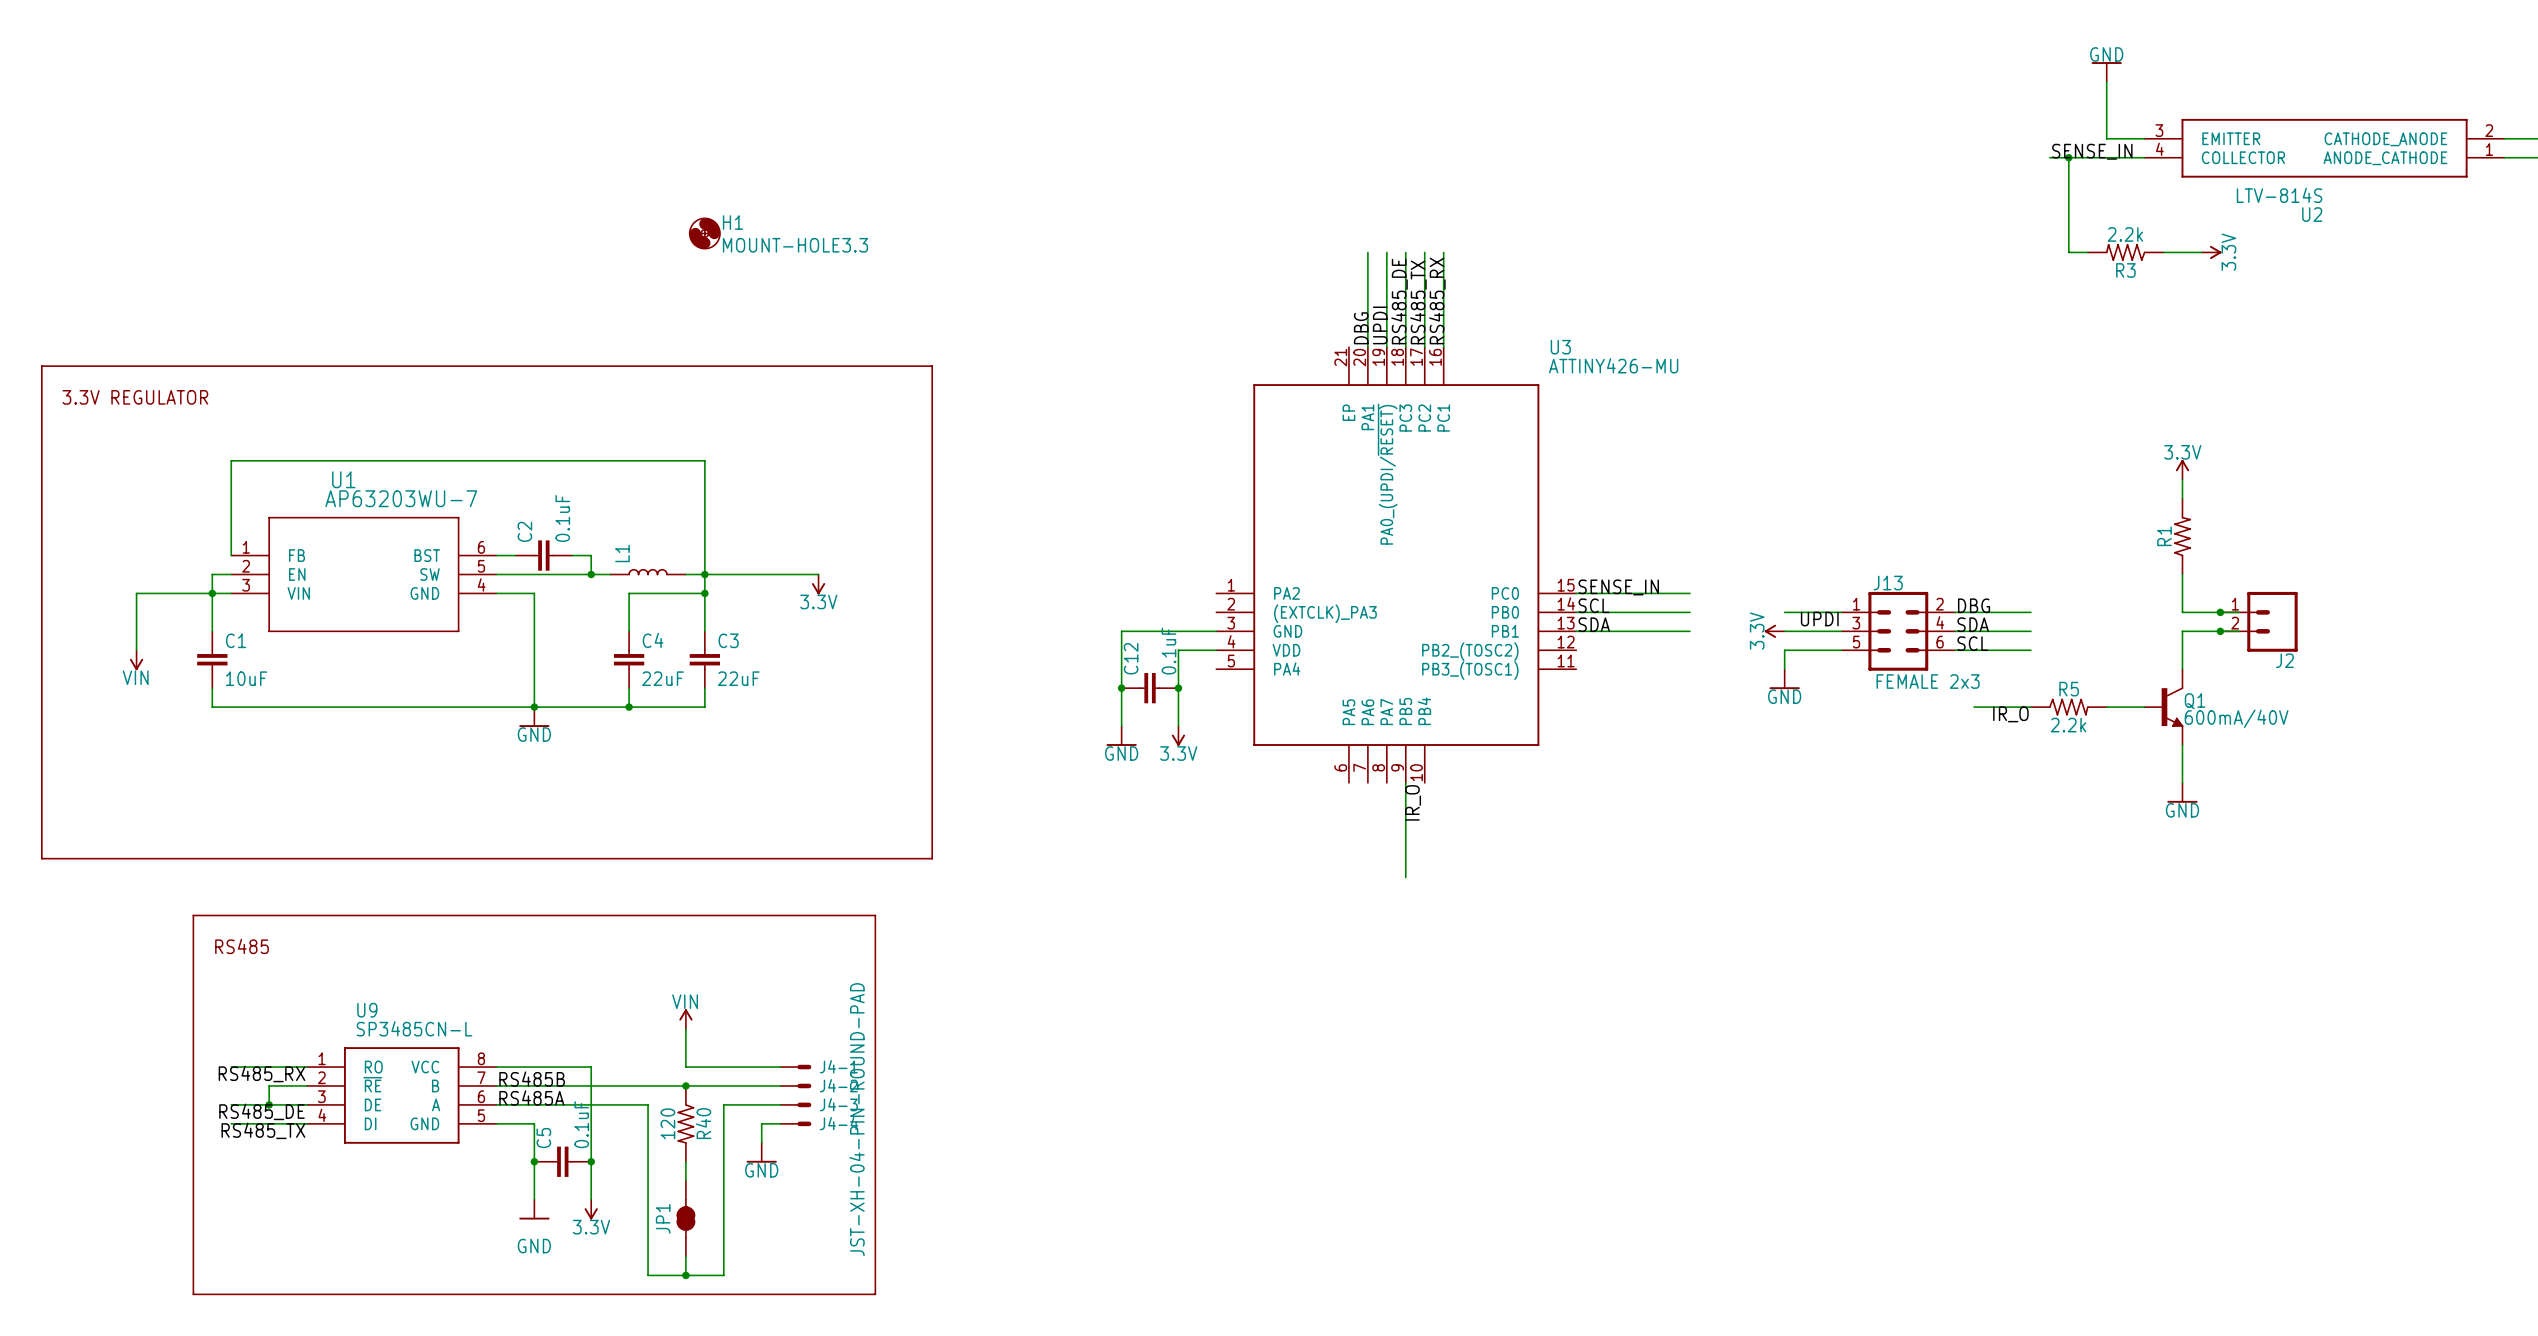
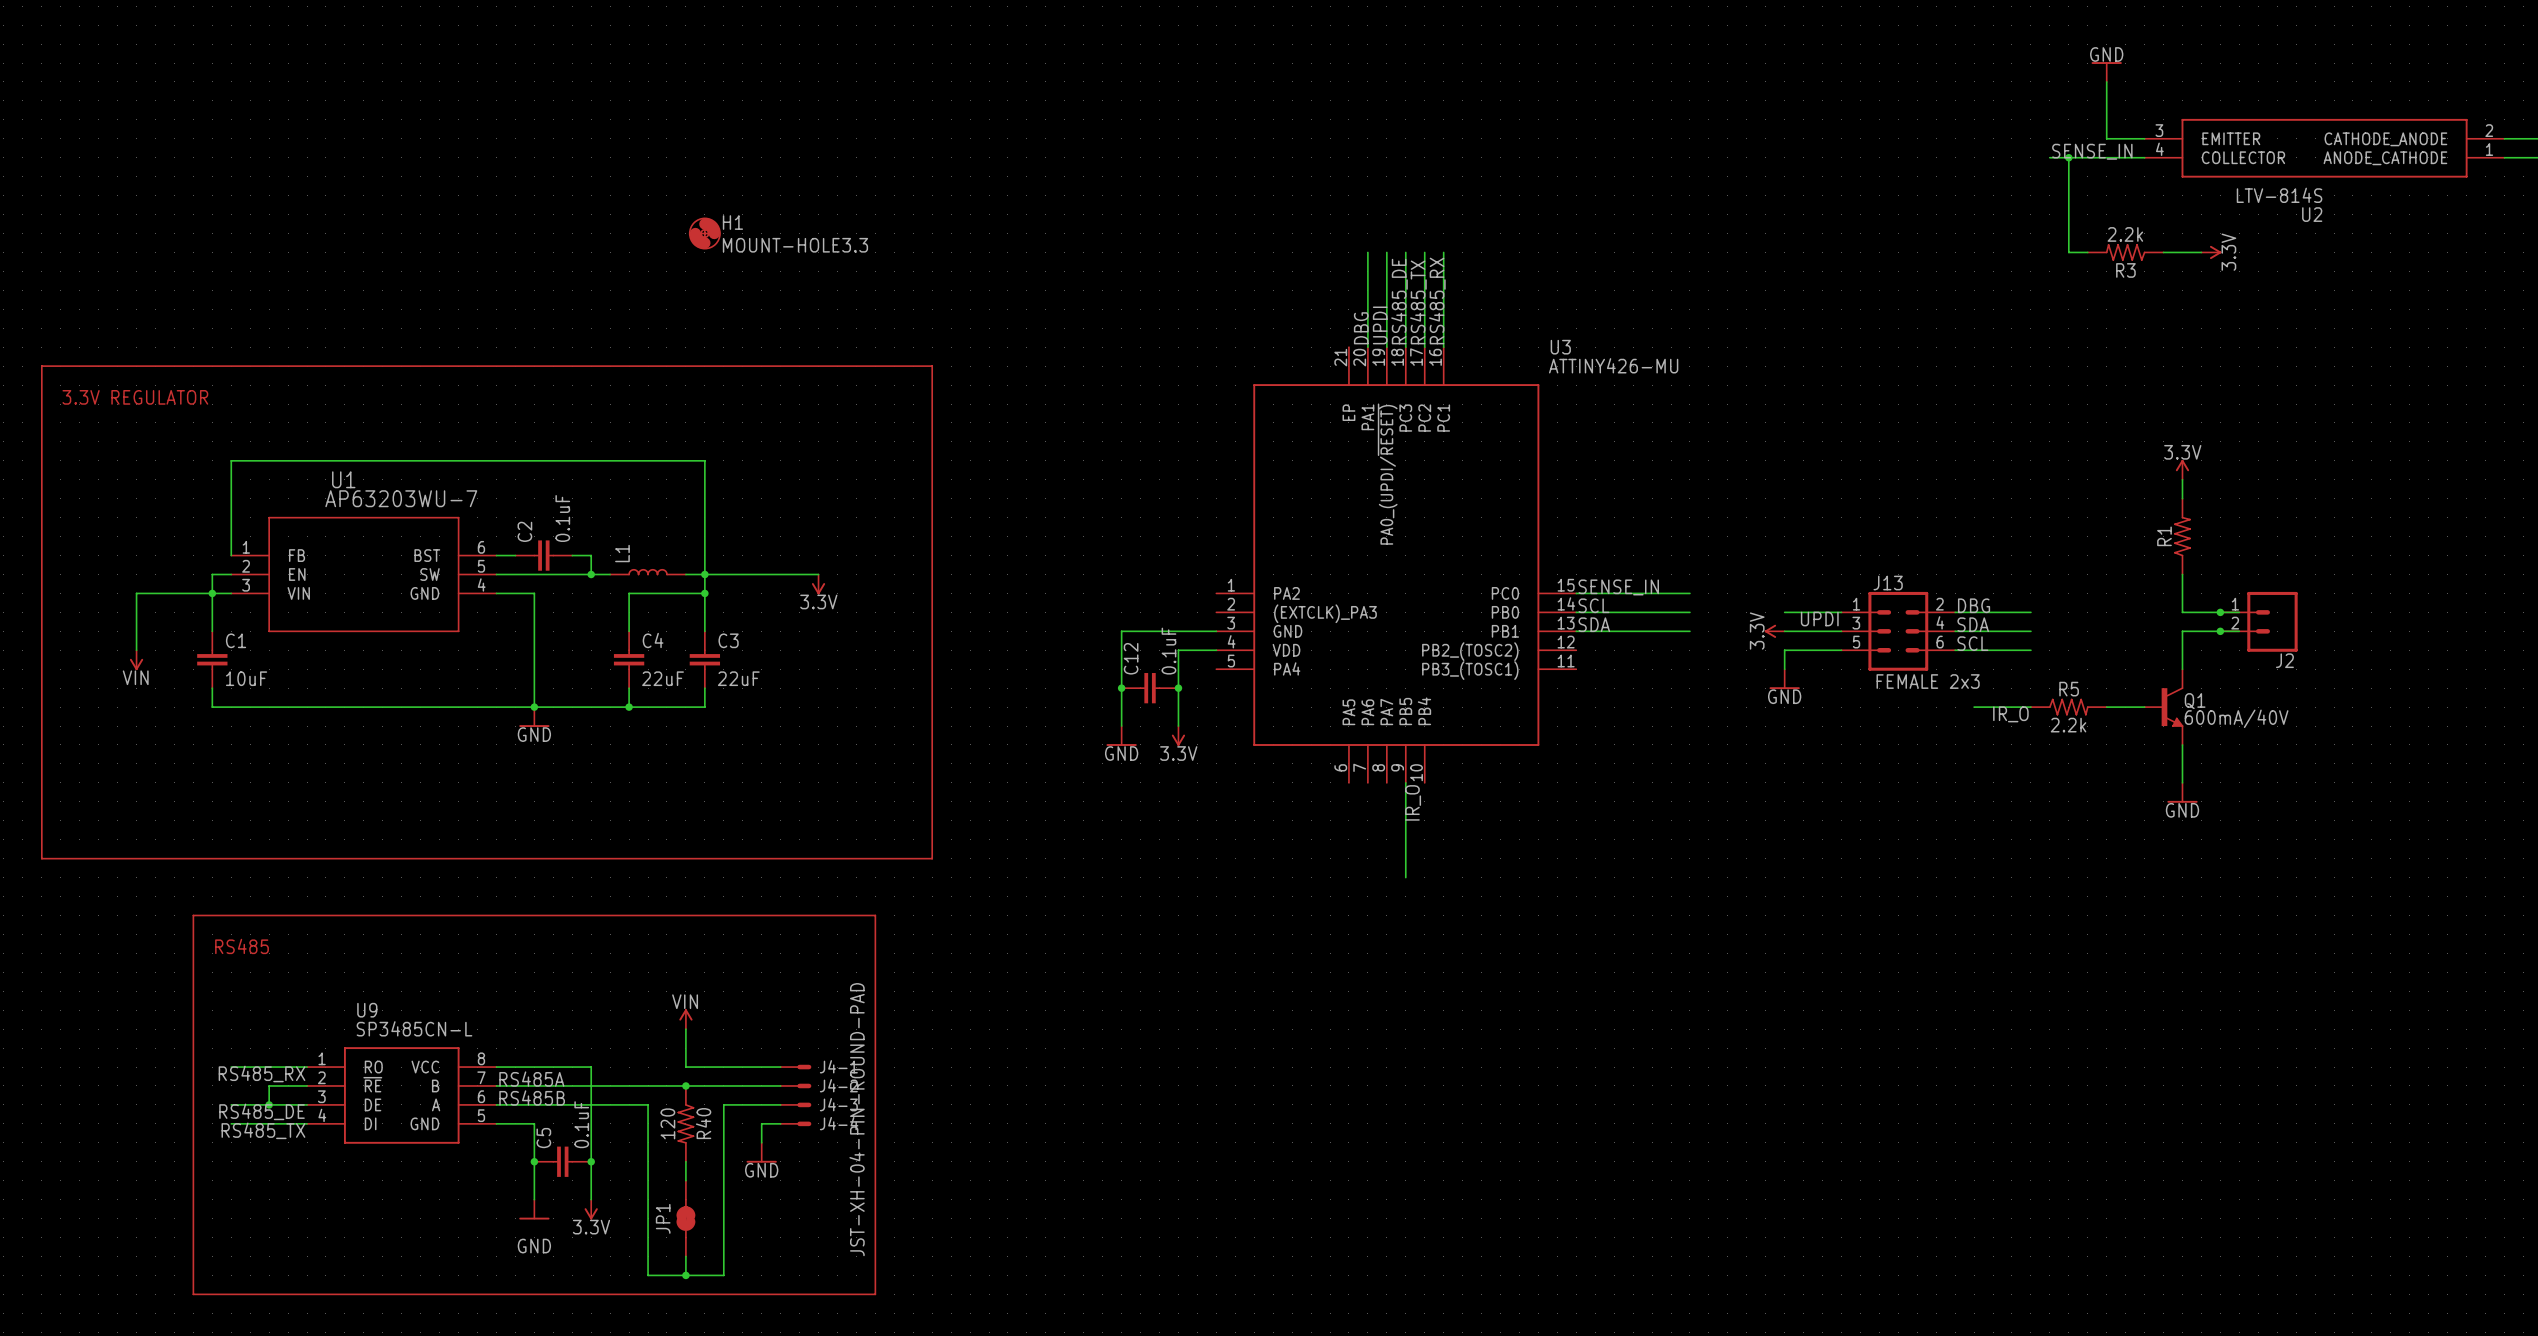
label: RS485B (532, 1079) -> RS485A (531, 1079)
label: RS485A (531, 1097) -> RS485B (532, 1097)

